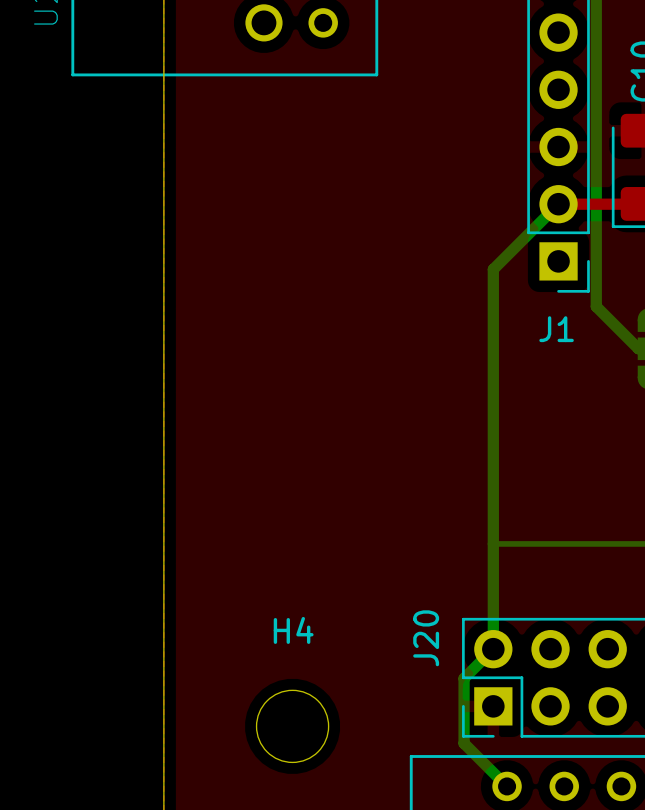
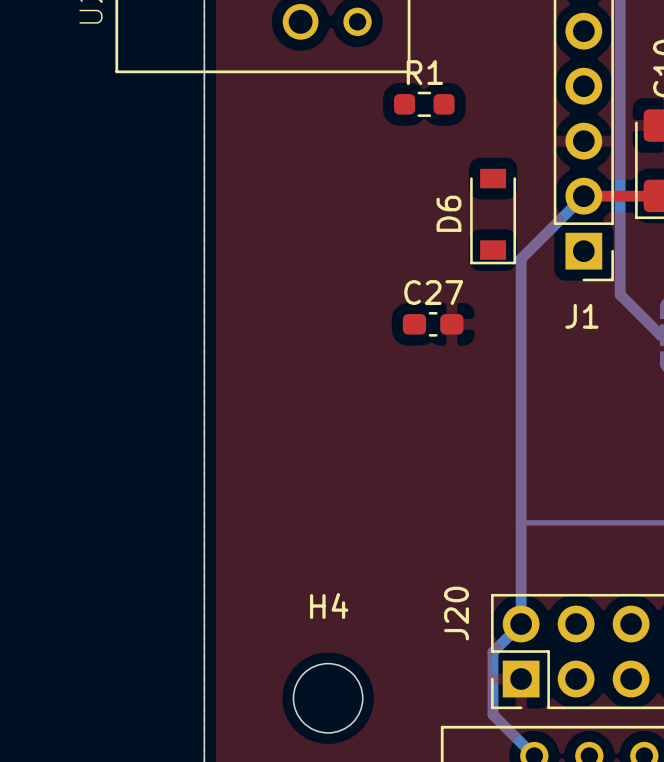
R1: none -> (424, 104)
D6: none -> (493, 216)
C27: none -> (433, 324)

